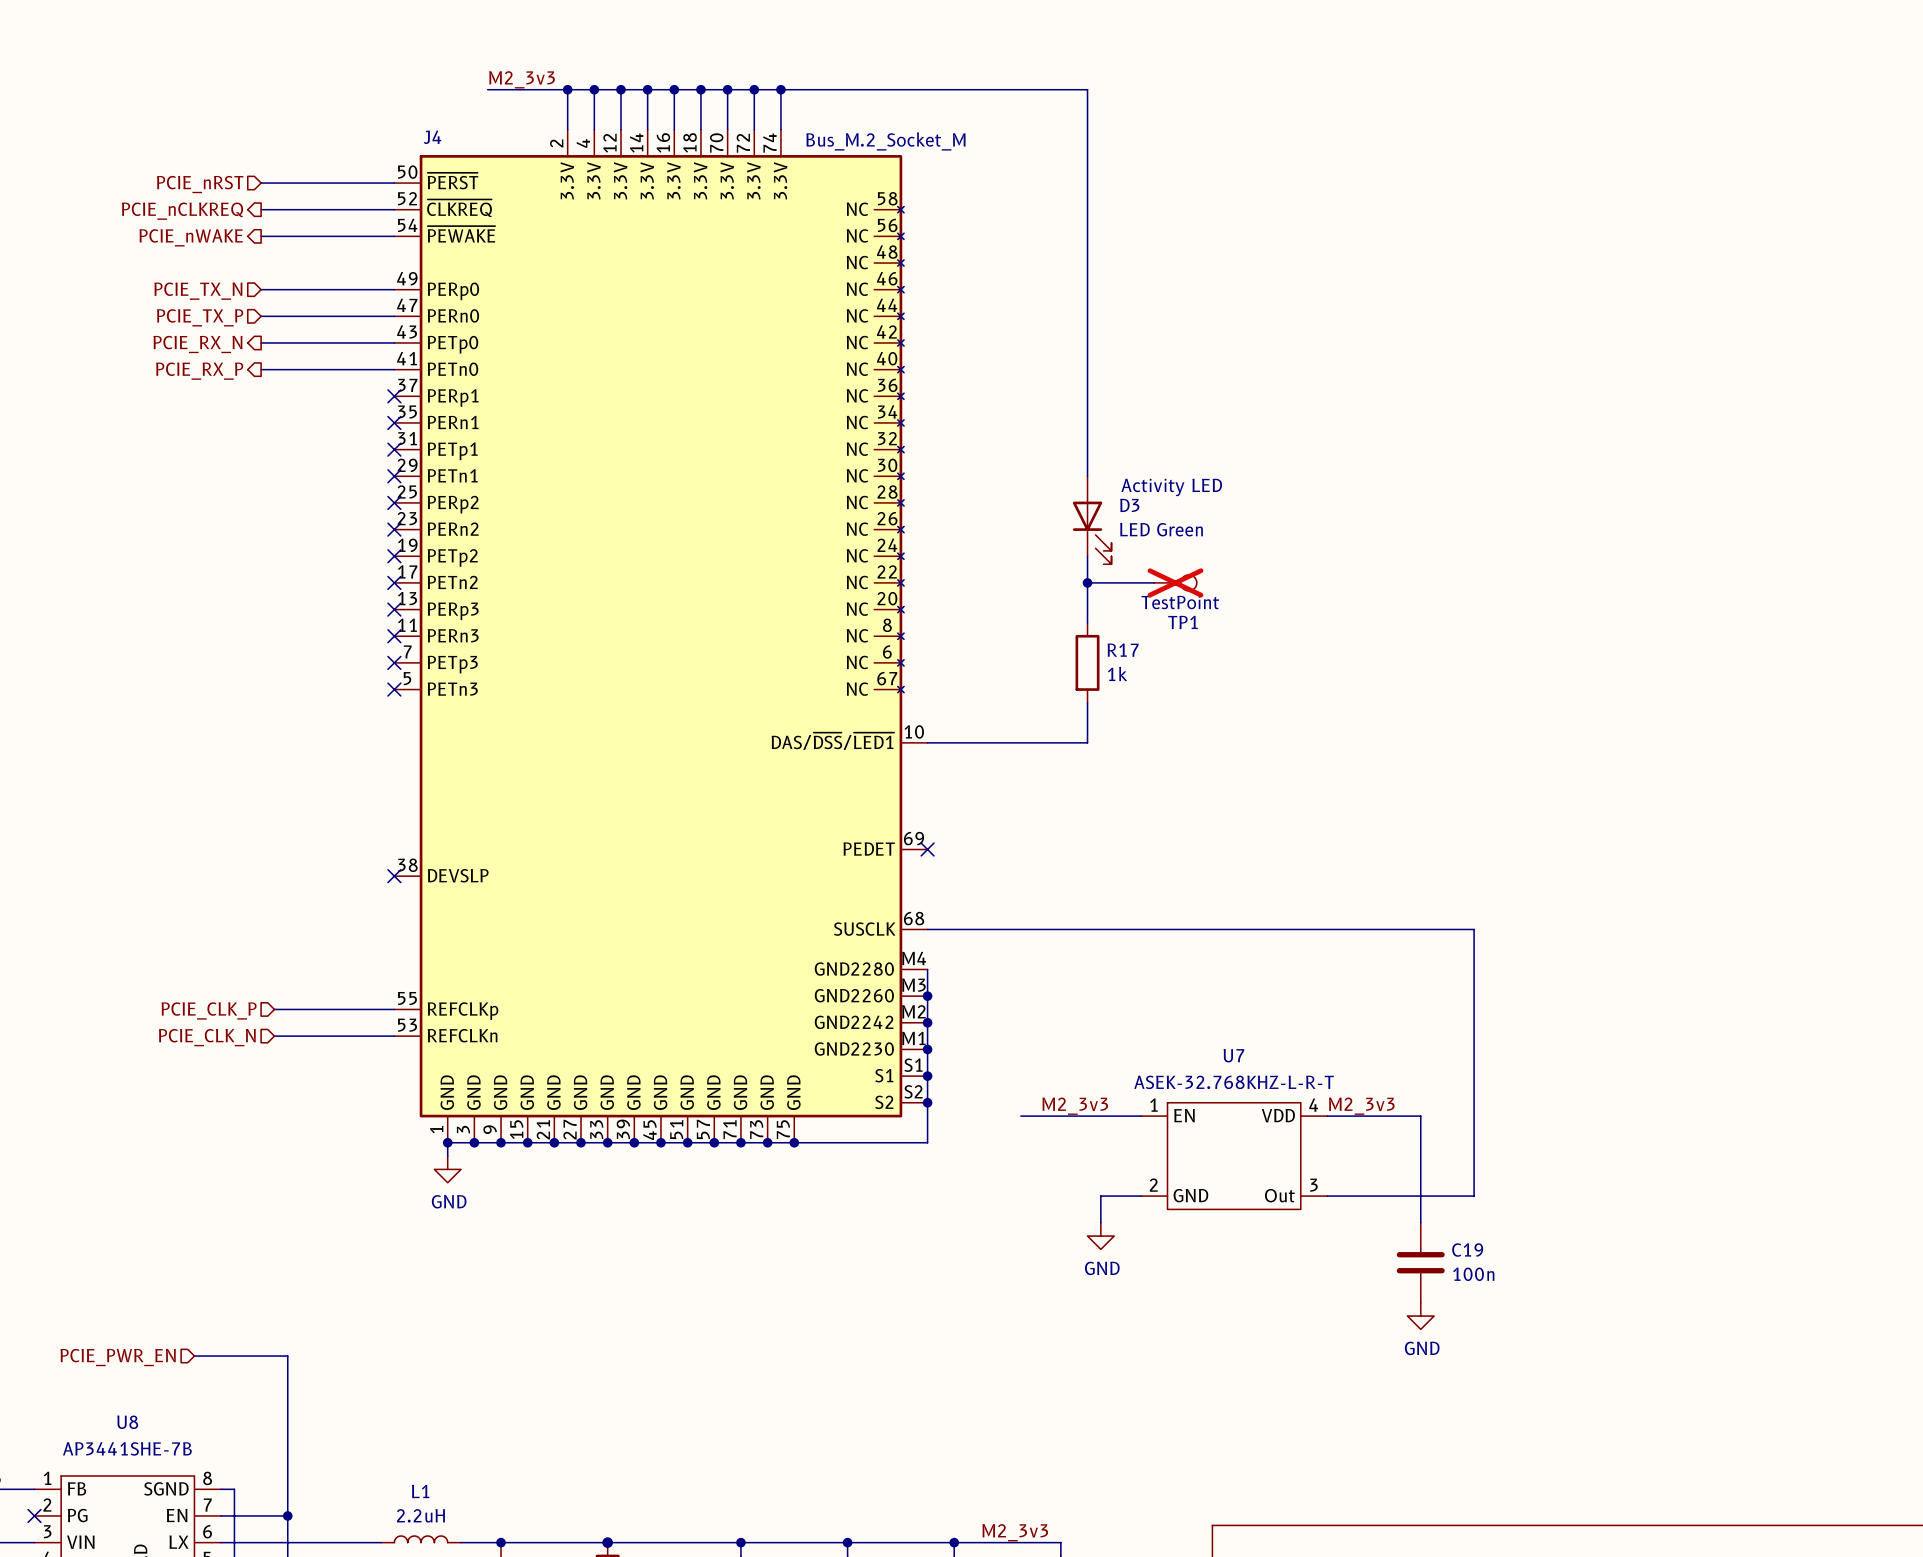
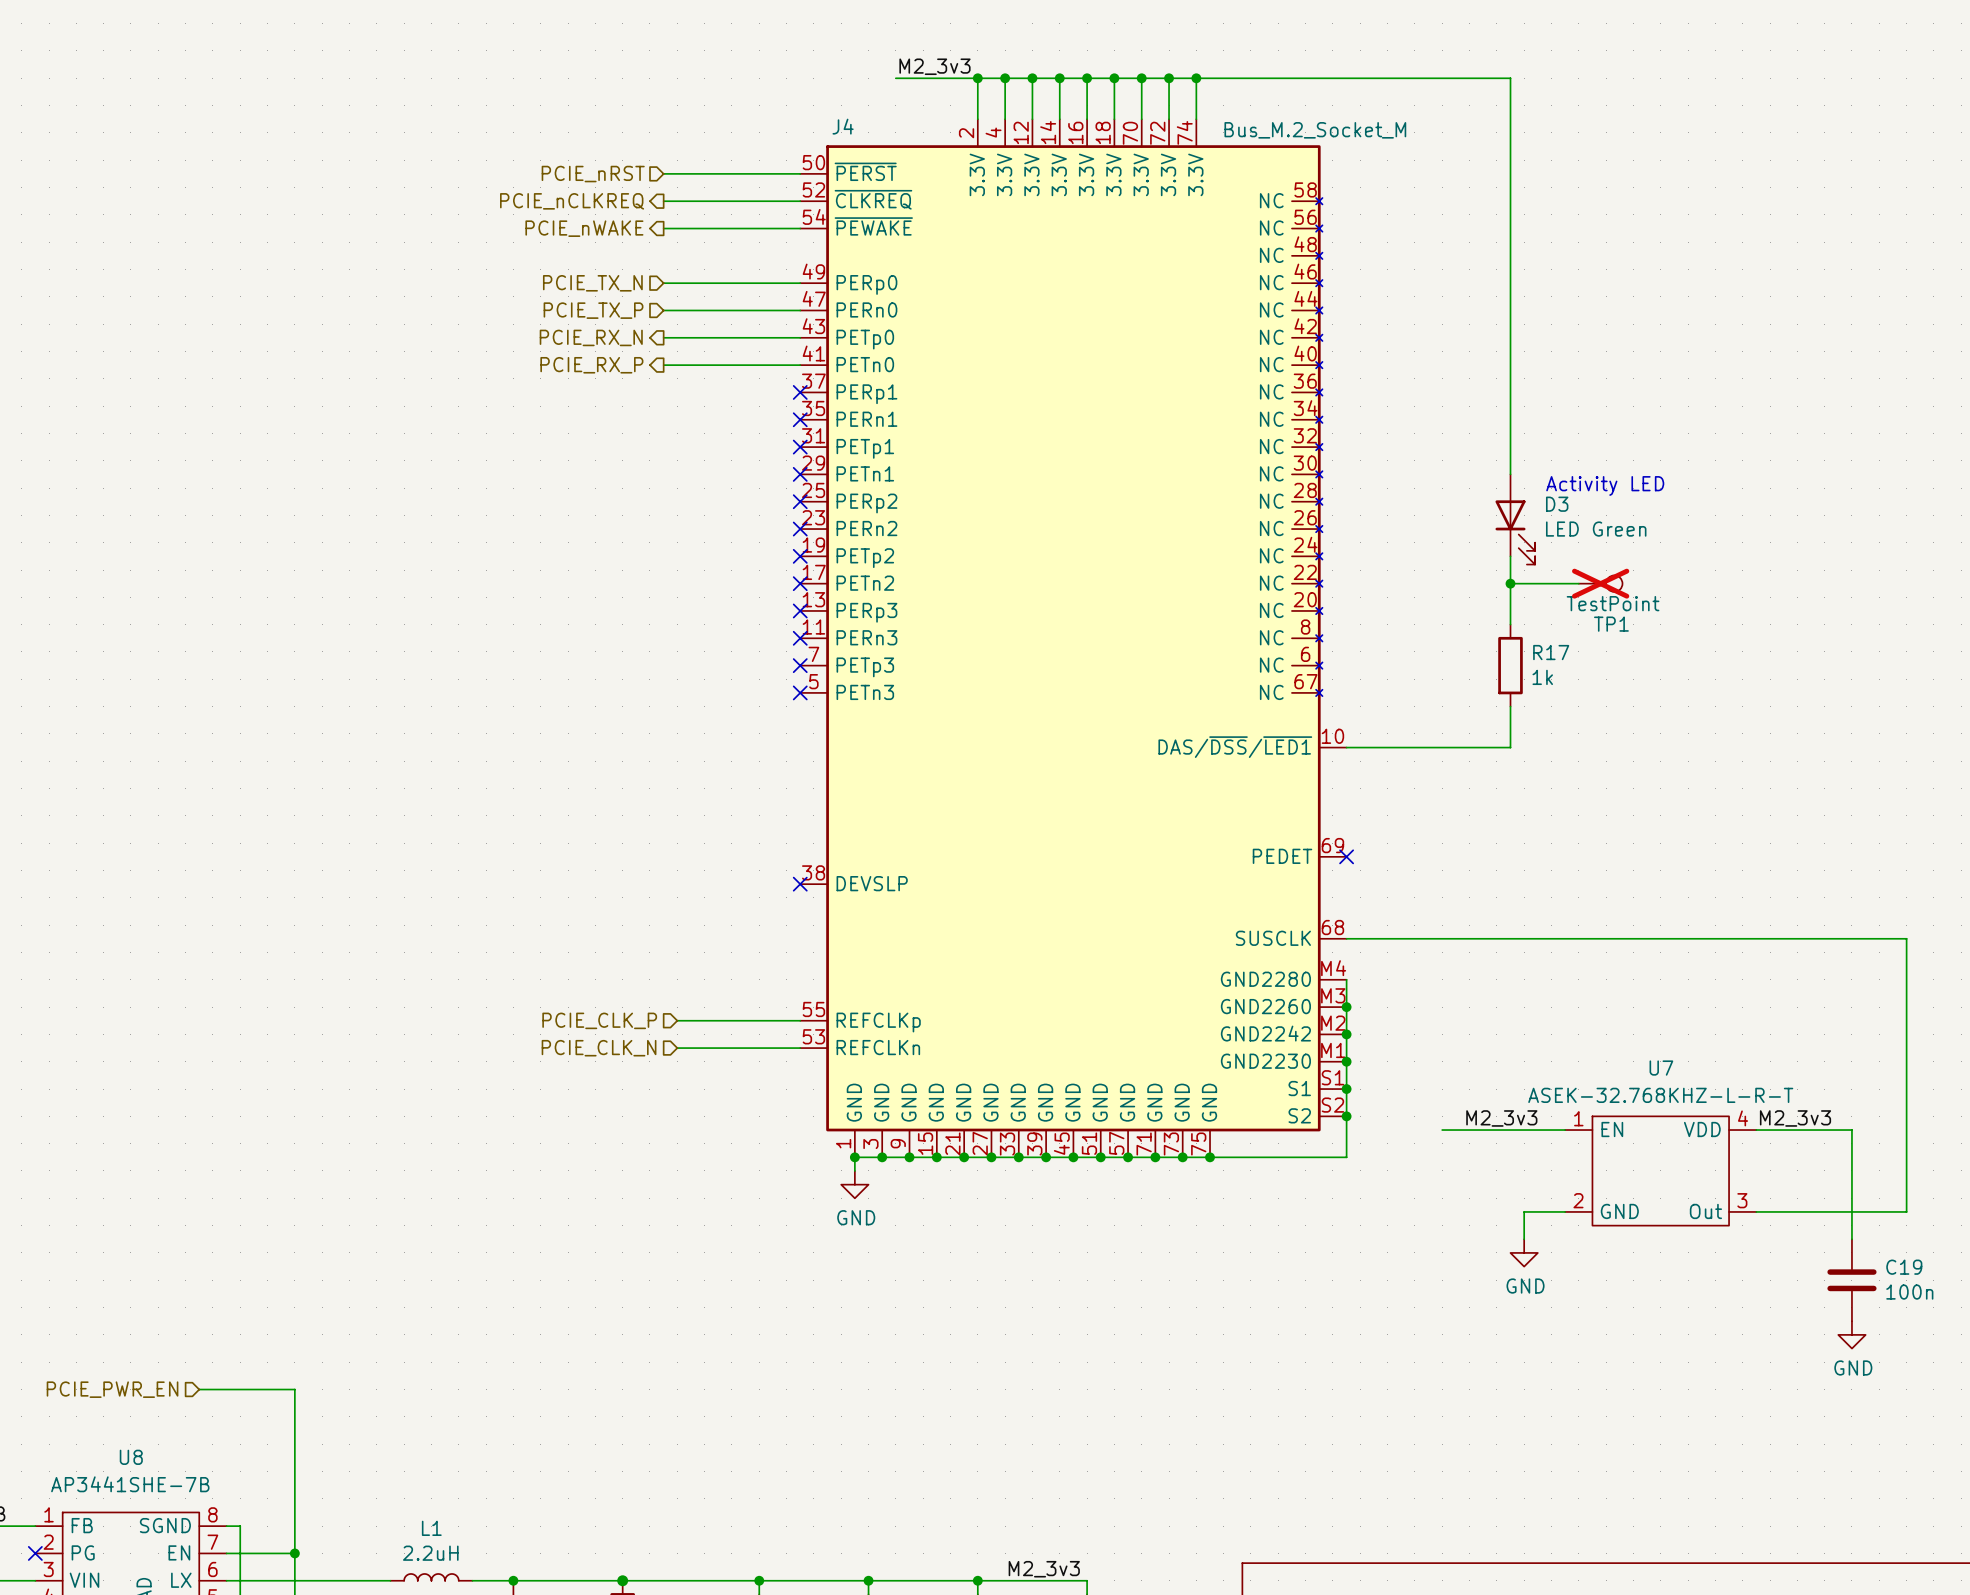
label: none -> M2_3v3 (934, 66)
wire: none -> (895, 78) (1510, 78) (1510, 474)
junction: none -> (977, 78)
junction: none -> (1005, 78)
junction: none -> (1032, 78)
junction: none -> (1059, 78)
wire: none -> (1087, 78) (1087, 119)
junction: none -> (1087, 78)
junction: none -> (1114, 78)
wire: none -> (1141, 78) (1141, 119)
junction: none -> (1141, 78)
wire: none -> (1169, 78) (1169, 119)
junction: none -> (1169, 78)
wire: none -> (1196, 78) (1196, 119)
junction: none -> (1196, 78)
label: M2_3v3 (522, 79) -> none
wire: (487, 89) (1087, 89) -> (1114, 78) (1114, 91)
wire: (567, 89) (567, 129) -> none
junction: (567, 89) -> none
wire: (594, 89) (594, 129) -> none
junction: (594, 89) -> none
wire: (620, 89) (620, 129) -> none
junction: (620, 89) -> none
wire: (647, 89) (647, 129) -> none
junction: (647, 89) -> none
wire: (674, 89) (674, 129) -> none
junction: (674, 89) -> none
wire: (700, 89) (700, 129) -> (977, 78) (977, 119)
junction: (700, 89) -> none
wire: (727, 89) (727, 129) -> (1005, 78) (1005, 119)
junction: (727, 89) -> none
wire: (754, 89) (754, 129) -> (1032, 78) (1032, 119)
junction: (754, 89) -> none
wire: (780, 89) (780, 129) -> (1059, 78) (1059, 119)
junction: (780, 89) -> none
hierarchical label: none -> PCIE_nRST (593, 174)
wire: (261, 183) (394, 183) -> none
hierarchical label: PCIE_nRST (200, 184) -> none
hierarchical label: none -> PCIE_nCLKREQ (572, 201)
wire: (261, 209) (394, 209) -> none
hierarchical label: PCIE_nCLKREQ (182, 211) -> none
hierarchical label: none -> PCIE_nWAKE (584, 228)
wire: (261, 236) (394, 236) -> none
hierarchical label: PCIE_nWAKE (191, 237) -> none
hierarchical label: none -> PCIE_TX_N (592, 283)
wire: (261, 289) (394, 289) -> none
hierarchical label: PCIE_TX_N (198, 291) -> none
hierarchical label: none -> PCIE_TX_P (593, 310)
wire: (261, 316) (394, 316) -> none
hierarchical label: PCIE_TX_P (200, 317) -> none
hierarchical label: none -> PCIE_RX_N (591, 337)
wire: (261, 342) (394, 342) -> none
hierarchical label: PCIE_RX_N (197, 344) -> none
hierarchical label: none -> PCIE_RX_P (591, 365)
wire: (261, 369) (394, 369) -> none
hierarchical label: PCIE_RX_P (199, 371) -> none
no-connect mark: none -> (800, 392)
no-connect mark: (394, 396) -> none
no-connect mark: none -> (800, 419)
no-connect mark: (394, 422) -> none
no-connect mark: none -> (800, 447)
no-connect mark: (394, 449) -> none
no-connect mark: none -> (800, 474)
text: none -> Activity LED (1605, 485)
no-connect mark: (394, 476) -> none
text: Activity LED (1171, 487) -> none
no-connect mark: none -> (800, 501)
no-connect mark: (394, 502) -> none
no-connect mark: none -> (800, 529)
D3 position: (1092, 520) -> (1515, 519)
no-connect mark: (394, 529) -> none
no-connect mark: none -> (800, 556)
wire: none -> (1510, 556) (1510, 624)
no-connect mark: (394, 556) -> none
no-connect mark: none -> (800, 583)
wire: none -> (1510, 583) (1578, 583)
junction: none -> (1510, 583)
no-connect mark: (394, 582) -> none
junction: (1087, 582) -> none
TP1 position: (1175, 582) -> (1600, 583)
no-connect mark: none -> (800, 610)
no-connect mark: (394, 609) -> none
no-connect mark: none -> (800, 638)
no-connect mark: (394, 636) -> none
J4 position: (660, 636) -> (1073, 638)
no-connect mark: none -> (800, 665)
no-connect mark: (394, 662) -> none
R17 position: (1087, 662) -> (1510, 665)
no-connect mark: none -> (800, 692)
no-connect mark: (394, 689) -> none
wire: none -> (1510, 706) (1510, 747) (1346, 747)
no-connect mark: none -> (1346, 856)
no-connect mark: (927, 849) -> none
no-connect mark: none -> (800, 884)
no-connect mark: (394, 876) -> none
wire: none -> (1346, 938) (1906, 938) (1906, 1211) (1756, 1211)
wire: (927, 929) (1474, 929) (1474, 1196) (1327, 1196) -> none
wire: none -> (1346, 979) (1346, 1157) (854, 1157) (854, 1170)
wire: (927, 969) (927, 1142) (447, 1142) (447, 1156) -> none
junction: none -> (1346, 1007)
junction: (927, 996) -> none
hierarchical label: none -> PCIE_CLK_P (599, 1020)
wire: (274, 1009) (394, 1009) -> none
junction: none -> (1346, 1034)
hierarchical label: PCIE_CLK_P (209, 1010) -> none
junction: (927, 1022) -> none
hierarchical label: none -> PCIE_CLK_N (599, 1048)
wire: (274, 1036) (394, 1036) -> none
junction: none -> (1346, 1061)
hierarchical label: PCIE_CLK_N (207, 1037) -> none
junction: (927, 1049) -> none
junction: none -> (1346, 1089)
junction: (927, 1076) -> none
junction: none -> (1346, 1116)
label: none -> M2_3v3 (1795, 1118)
junction: (927, 1102) -> none
wire: none -> (1442, 1130) (1565, 1130)
wire: none -> (1756, 1130) (1851, 1130) (1851, 1239)
label: M2_3v3 (1075, 1106) -> none
label position: M2_3v3 (1361, 1106) -> M2_3v3 (1501, 1118)
wire: (1020, 1116) (1140, 1116) -> none
wire: (1327, 1116) (1420, 1116) (1420, 1222) -> none
junction: none -> (854, 1157)
junction: none -> (882, 1157)
junction: none -> (909, 1157)
junction: none -> (936, 1157)
junction: none -> (964, 1157)
junction: none -> (991, 1157)
junction: none -> (1018, 1157)
junction: none -> (1046, 1157)
junction: none -> (1073, 1157)
junction: none -> (1100, 1157)
junction: none -> (1128, 1157)
junction: none -> (1155, 1157)
junction: none -> (1182, 1157)
junction: none -> (1210, 1157)
junction: (447, 1142) -> none
junction: (474, 1142) -> none
junction: (501, 1142) -> none
junction: (527, 1142) -> none
junction: (554, 1142) -> none
junction: (581, 1142) -> none
junction: (607, 1142) -> none
junction: (634, 1142) -> none
junction: (660, 1142) -> none
junction: (687, 1142) -> none
junction: (714, 1142) -> none
junction: (740, 1142) -> none
junction: (767, 1142) -> none
junction: (794, 1142) -> none
power symbol: none -> GND (854, 1184)
U7 position: (1234, 1156) -> (1660, 1170)
power symbol: GND (447, 1169) -> none
wire: none -> (1565, 1211) (1524, 1211) (1524, 1239)
wire: (1140, 1196) (1100, 1196) (1100, 1222) -> none
power symbol: GND (1100, 1236) -> none
C19 position: (1420, 1262) -> (1851, 1280)
power symbol: none -> GND (1851, 1334)
power symbol position: GND (1420, 1316) -> GND (1524, 1252)

